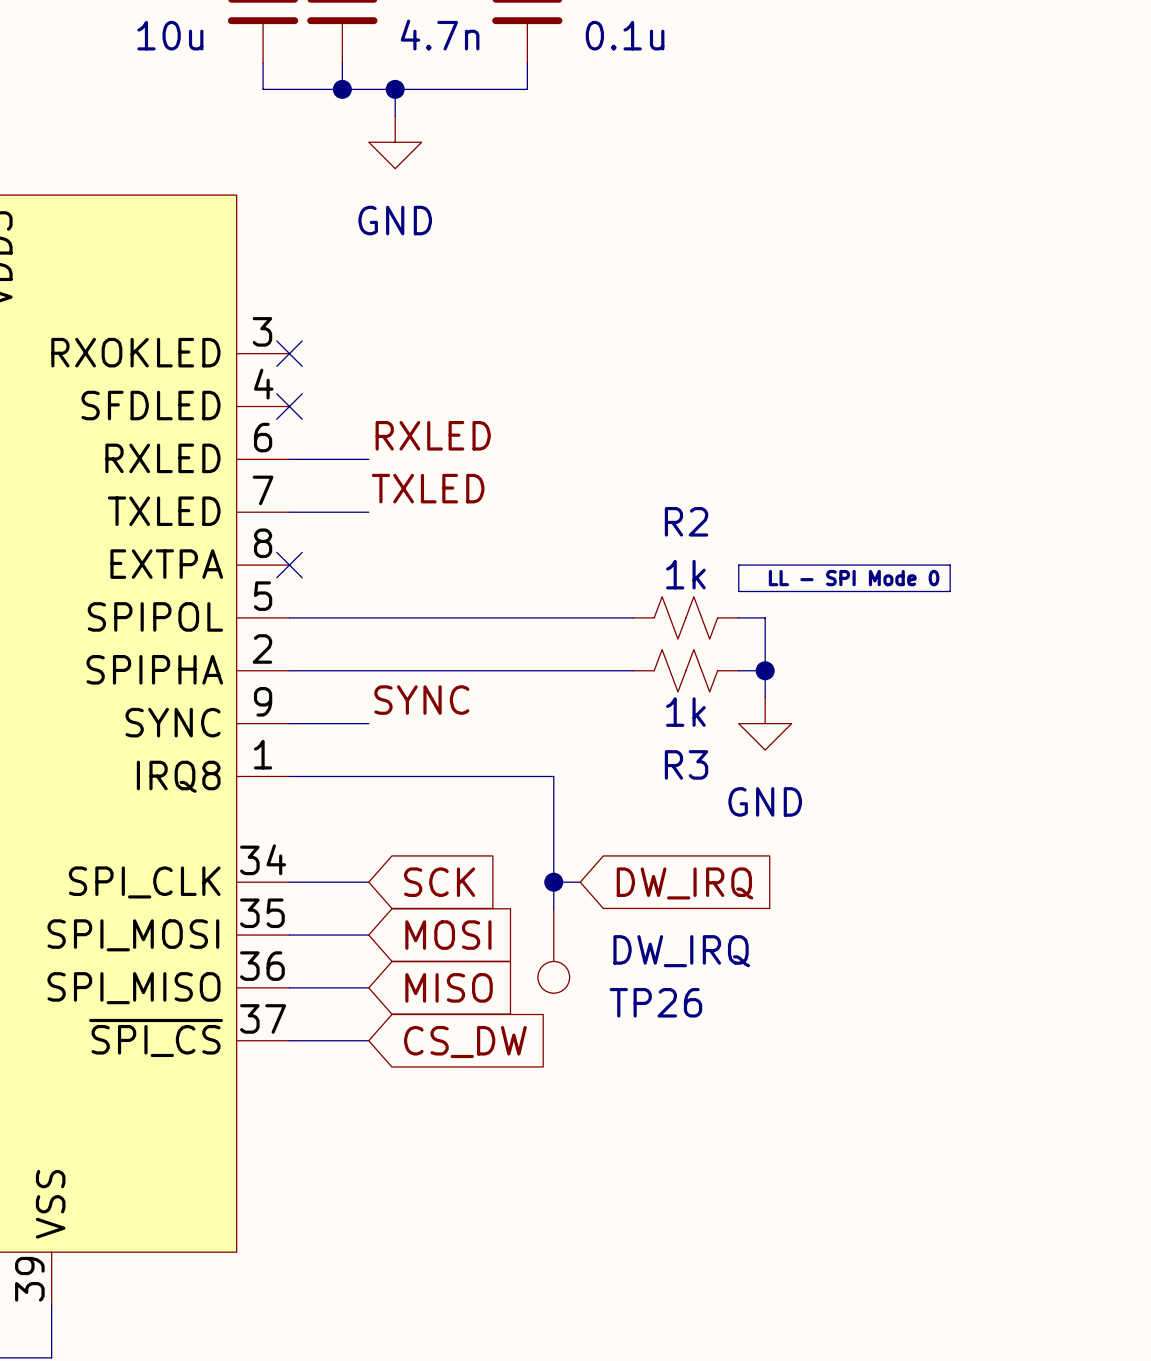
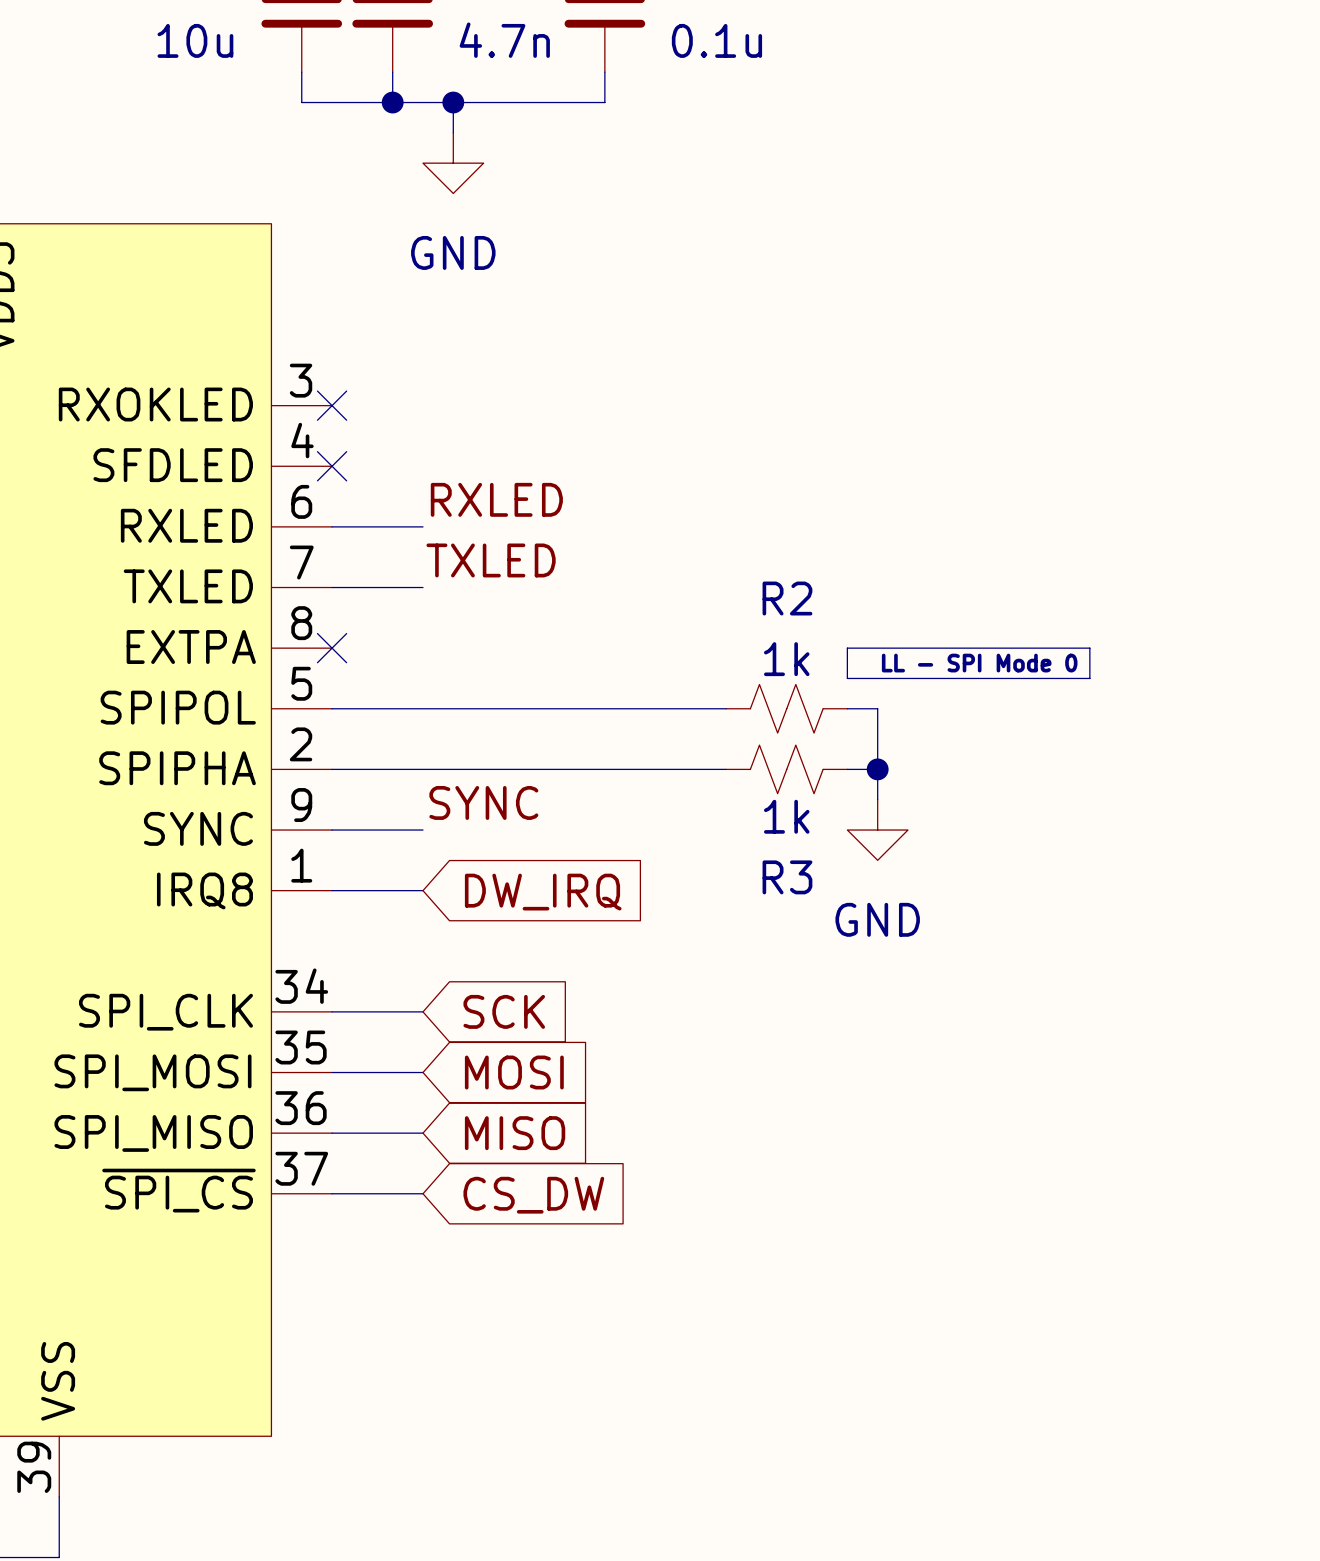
wire: (368, 776) (553, 776) (553, 908) -> none
wire: (553, 882) (580, 882) -> none
junction: (553, 882) -> none
global label position: DW_IRQ (685, 883) -> DW_IRQ (543, 892)
TP26: DW_IRQ (553, 950) -> none

